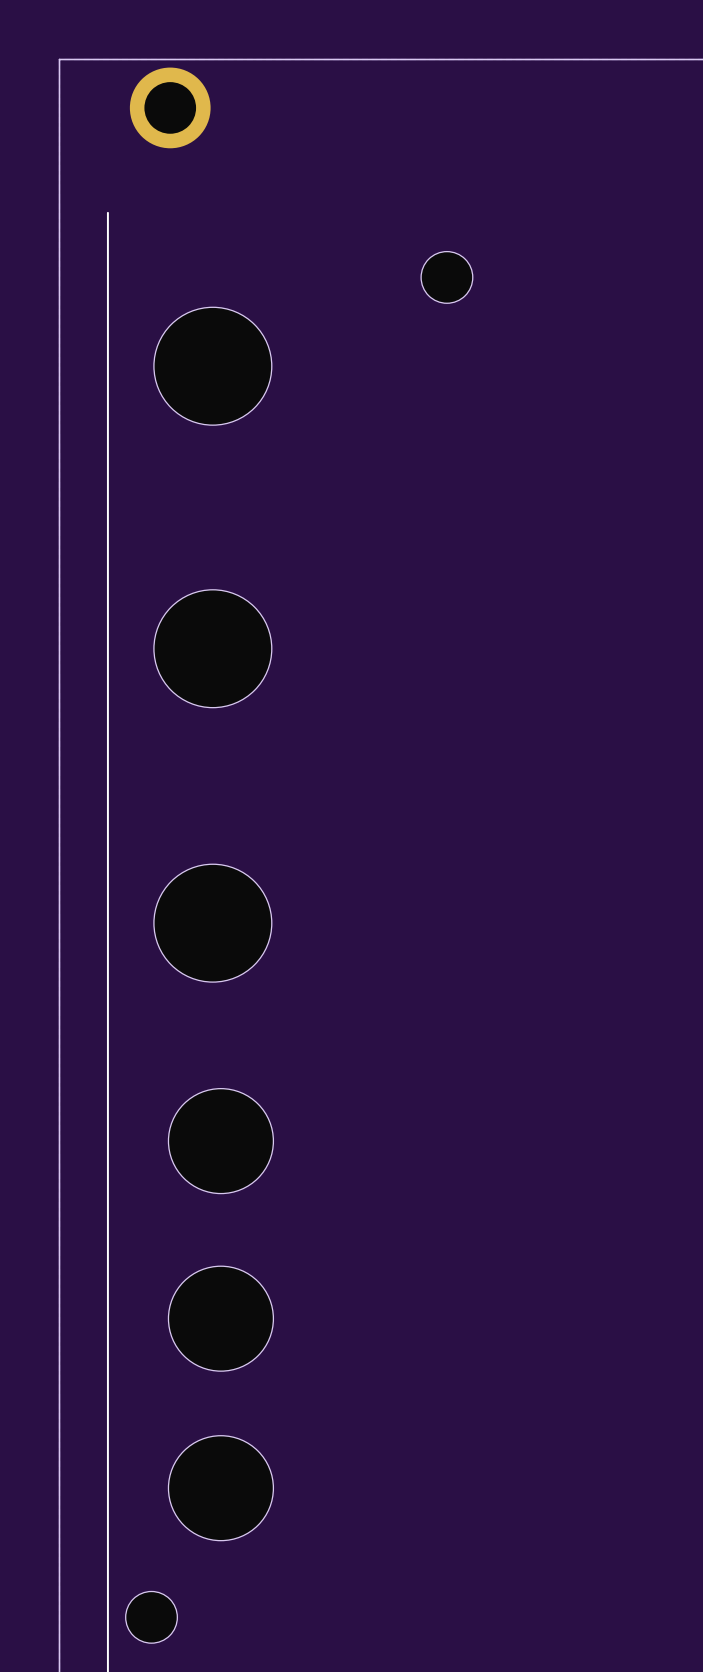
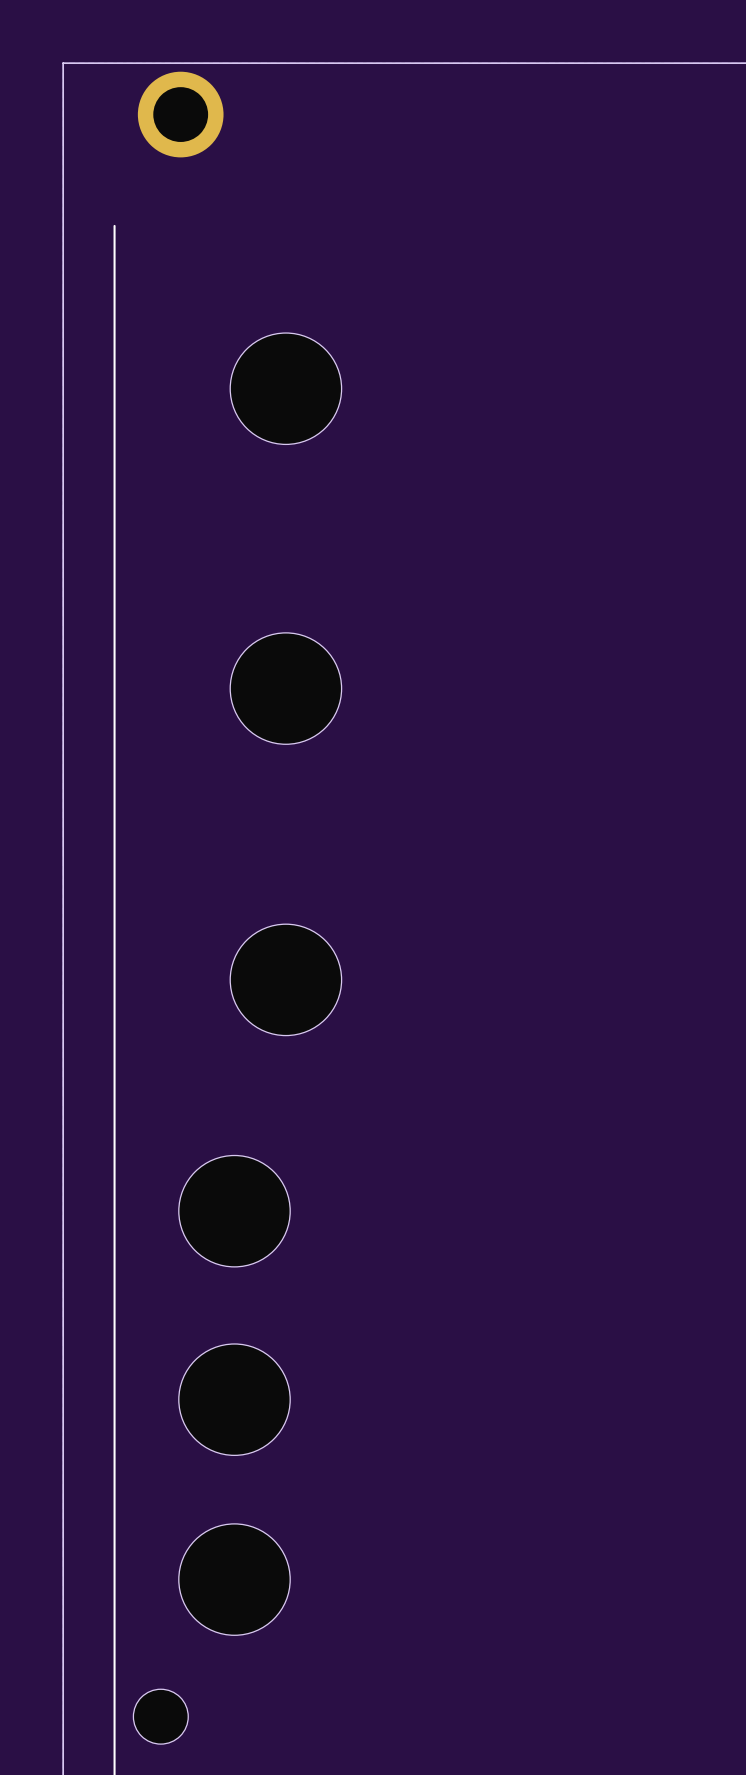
part: (446, 277) -> none
part: (212, 366) -> none
part: none -> (285, 388)
part: (212, 648) -> none
part: none -> (285, 688)
part: (212, 923) -> none
part: none -> (285, 979)

